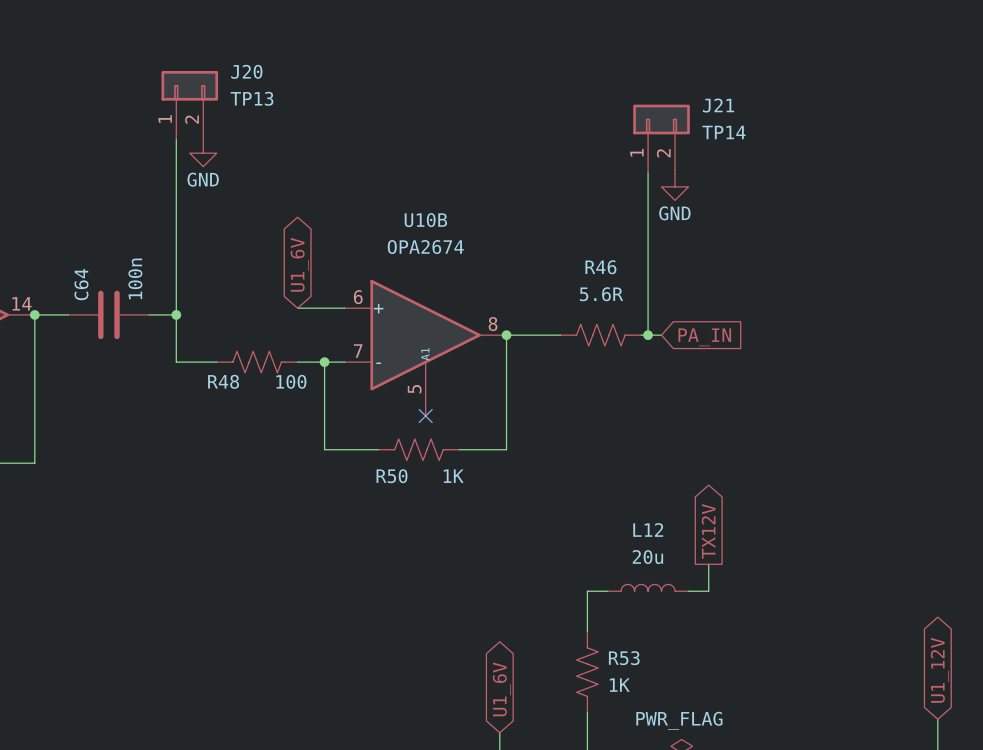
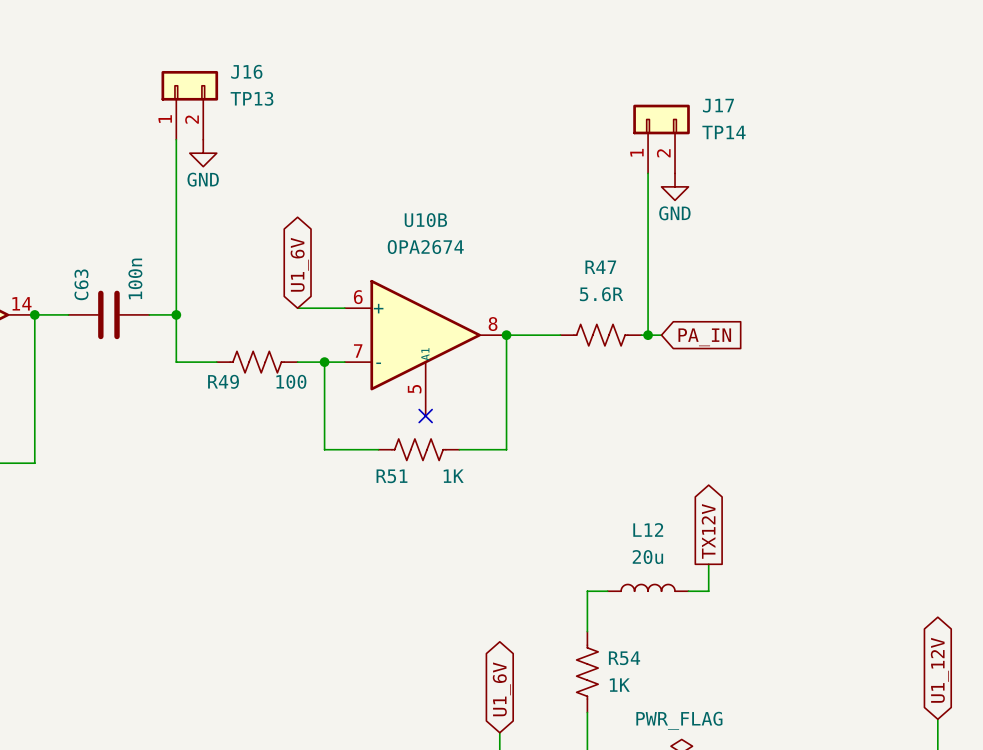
J20 name: J20 (246, 71) -> J16 (246, 71)
J21 name: J21 (718, 105) -> J17 (718, 105)
R46 name: R46 (600, 267) -> R47 (600, 267)
C64 name: C64 (81, 284) -> C63 (81, 284)
R48 name: R48 (223, 381) -> R49 (223, 381)
R50 name: R50 (392, 476) -> R51 (391, 476)
R53 name: R53 (624, 658) -> R54 (624, 658)

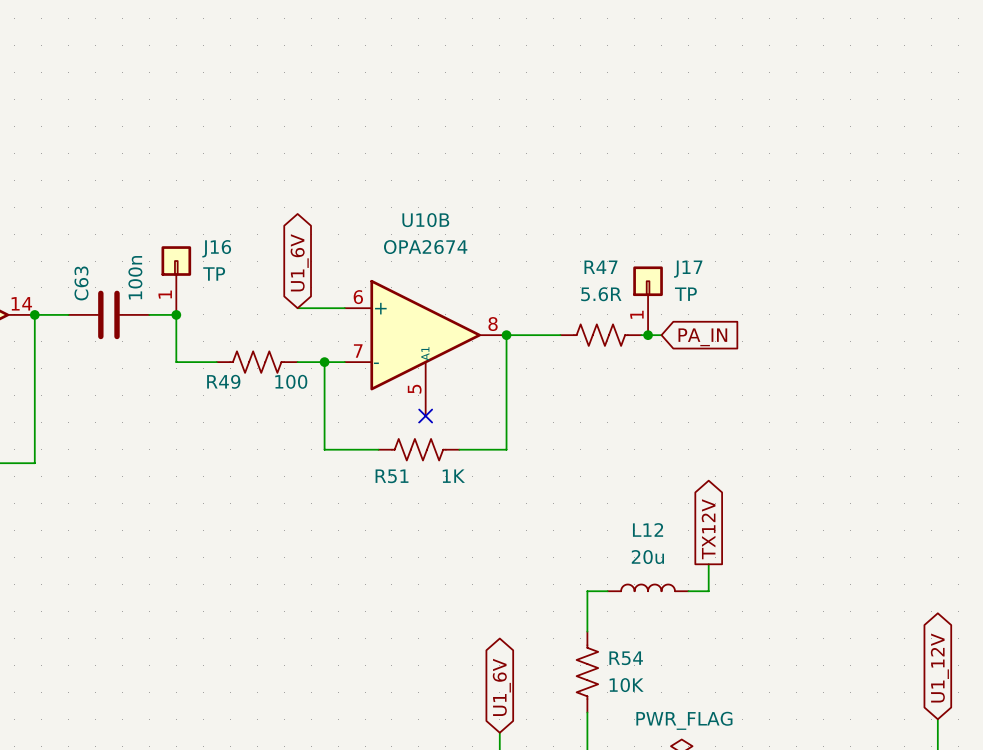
J16 symbol: [161, 70, 219, 140] -> [161, 246, 192, 315]
J16 value: TP13 (252, 98) -> TP (214, 273)
J17 symbol: [633, 104, 690, 174] -> [633, 266, 663, 336]
J17 value: TP14 (723, 132) -> TP (685, 294)
wire: (176, 139) (176, 314) -> none
power symbol: GND (203, 153) -> none
wire: (648, 173) (648, 335) -> none
power symbol: GND (675, 186) -> none
R54 value: 1K (619, 685) -> 10K (626, 685)

